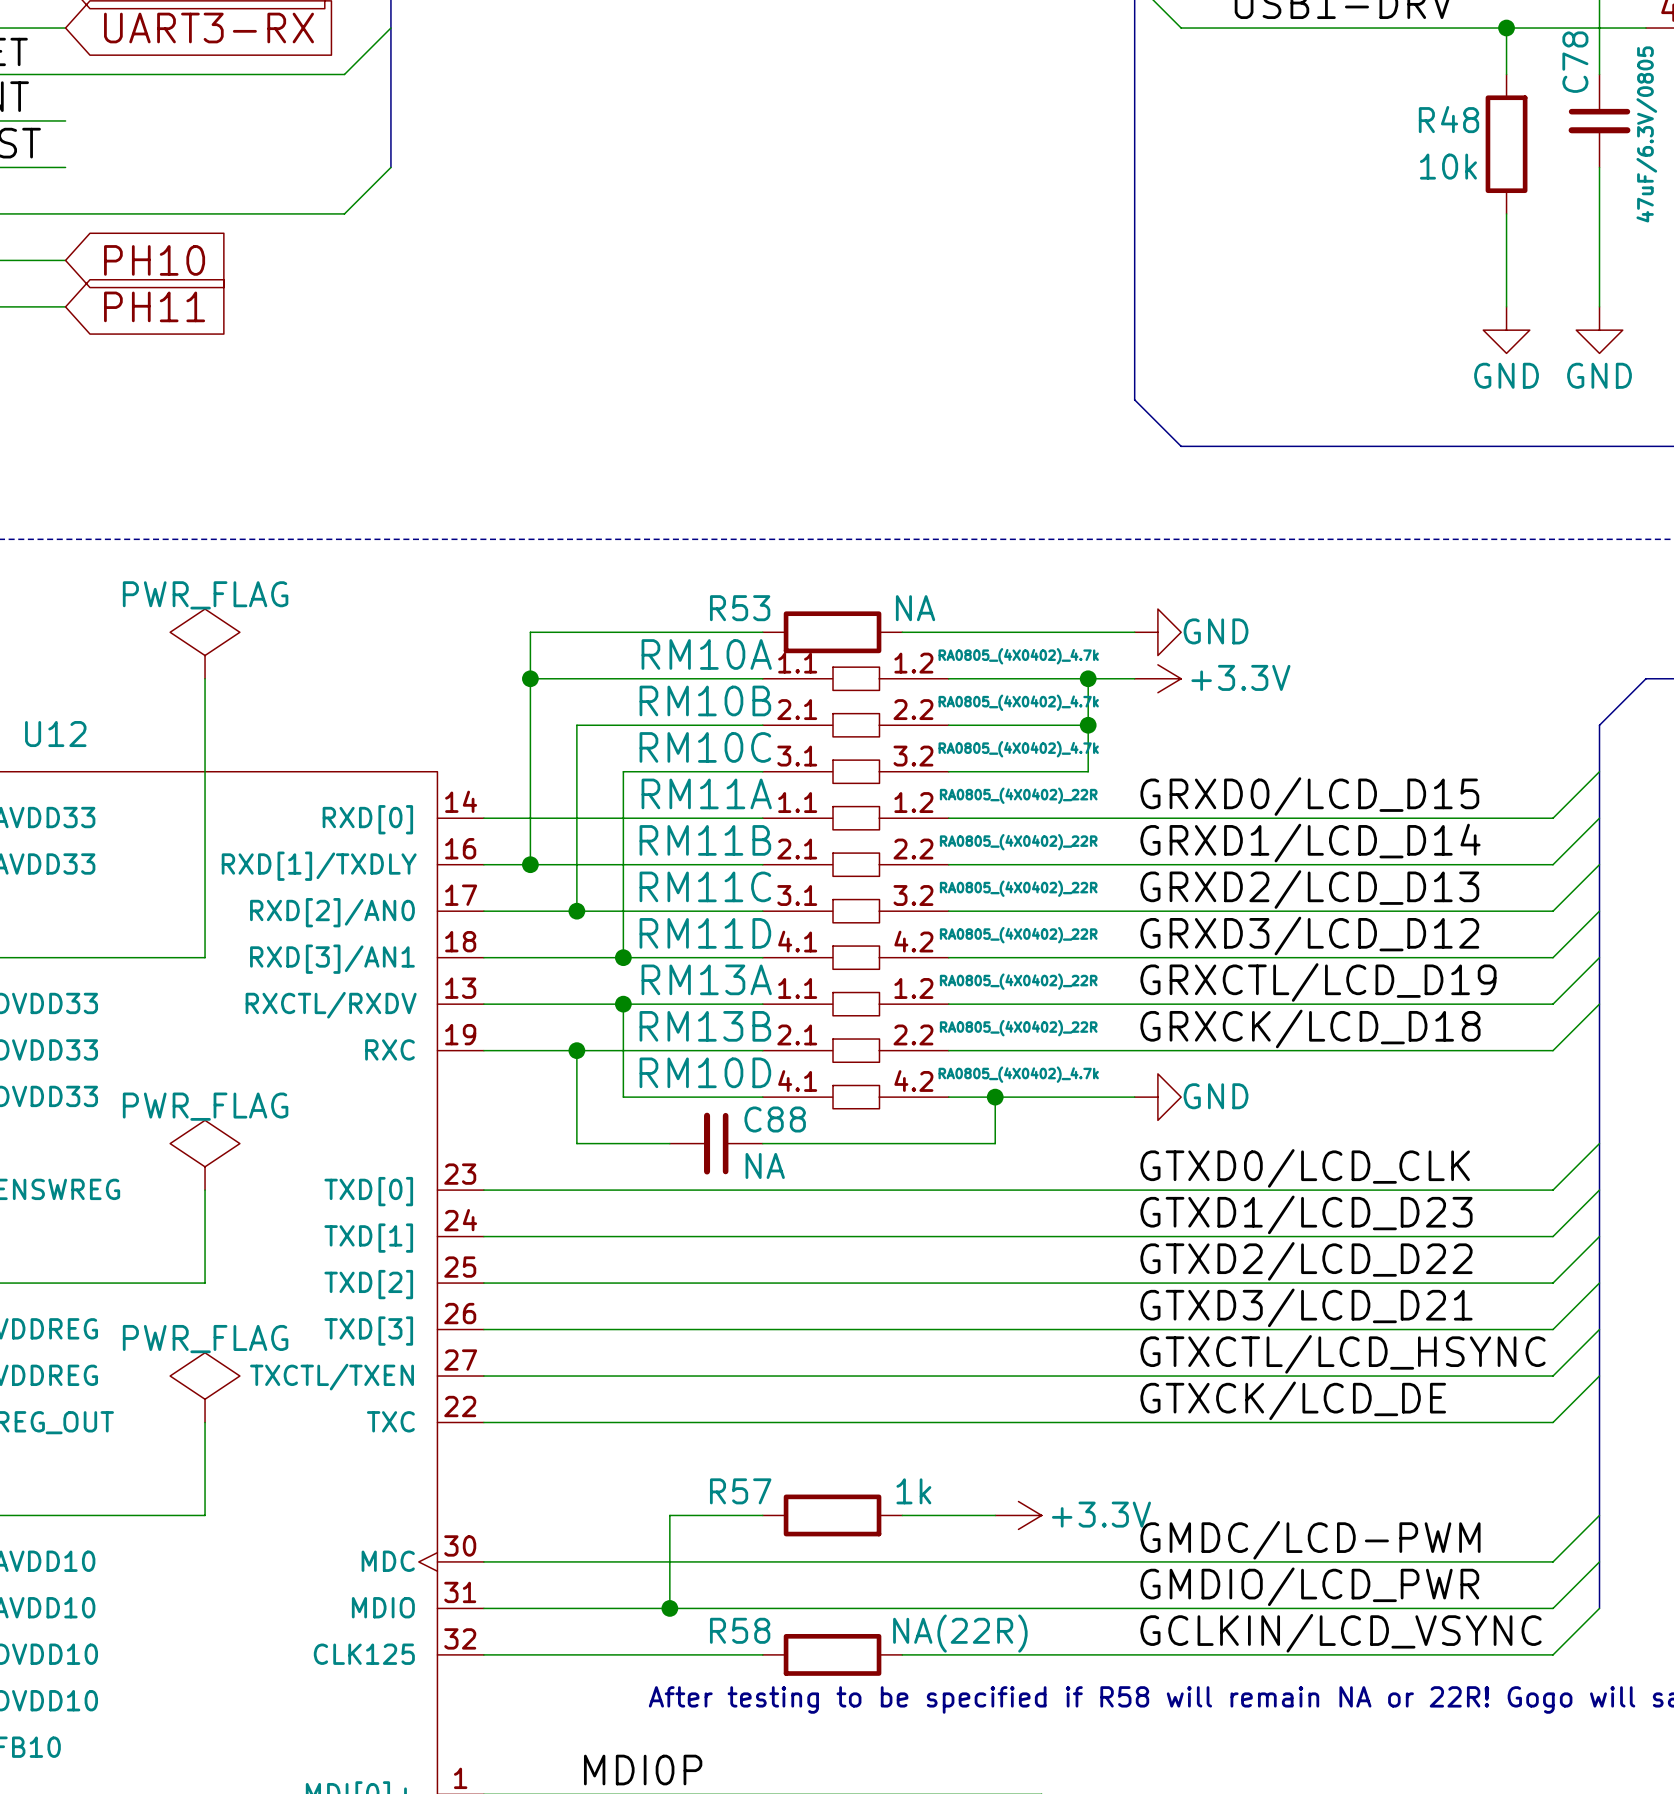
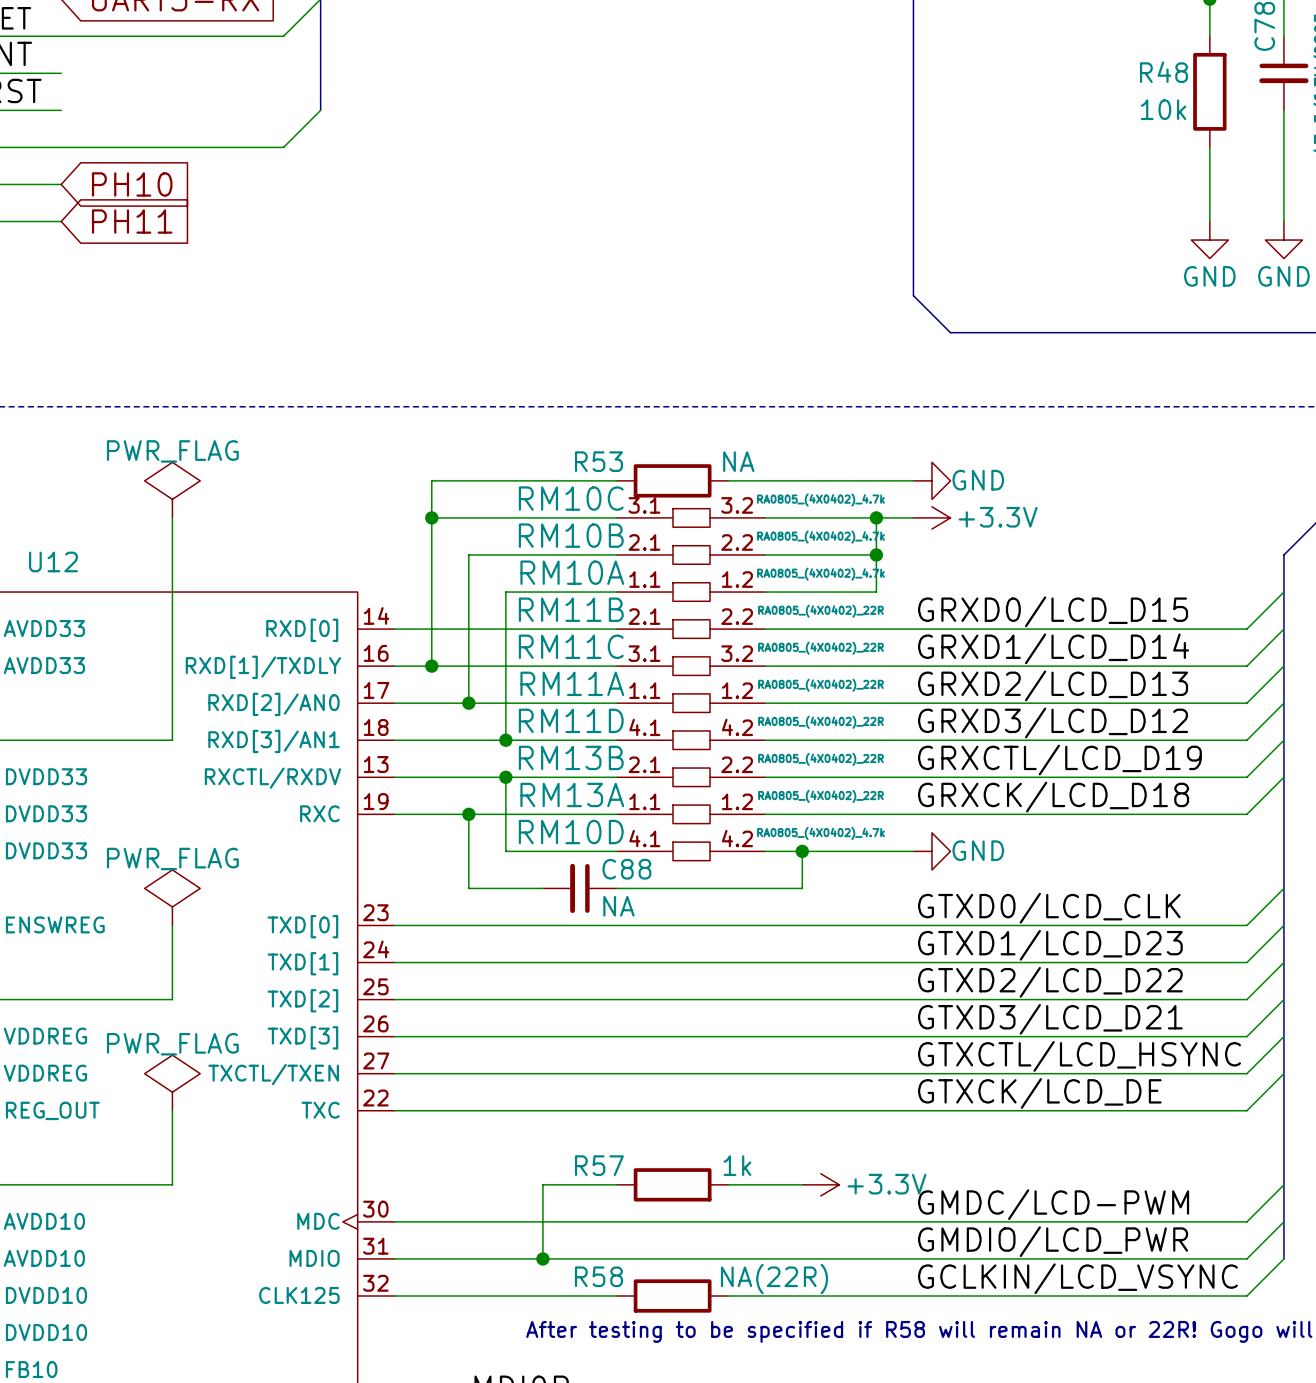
RM10A position: (855, 678) -> (691, 592)
RM10C position: (855, 771) -> (691, 517)
RM11A position: (855, 818) -> (691, 703)
RM11B position: (855, 864) -> (691, 629)
RM11C position: (855, 911) -> (691, 666)
RM13A position: (855, 1004) -> (691, 814)
RM13B position: (855, 1050) -> (691, 777)

